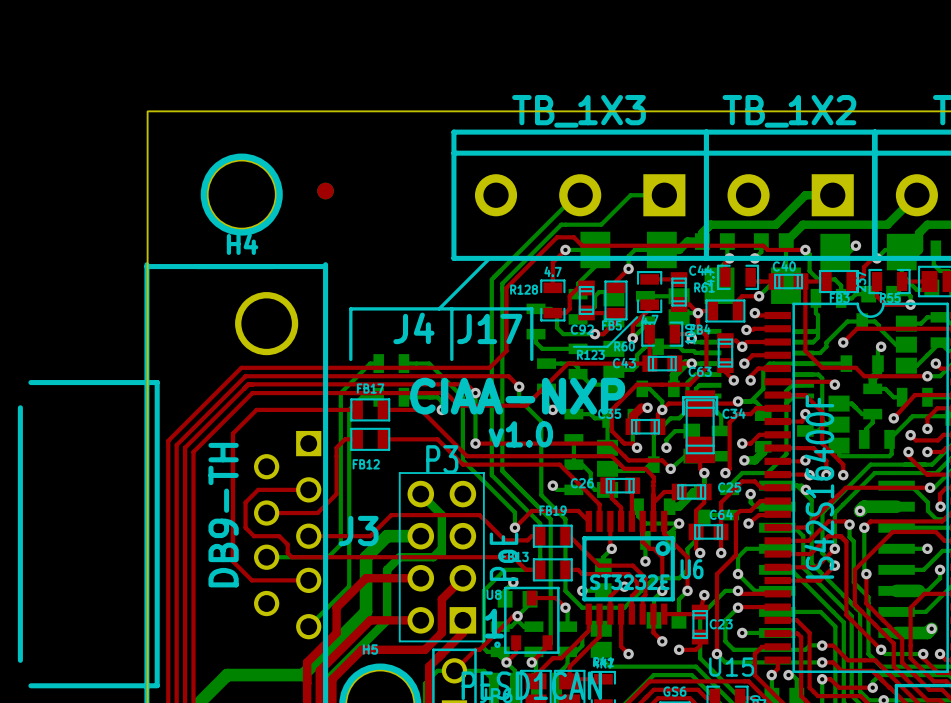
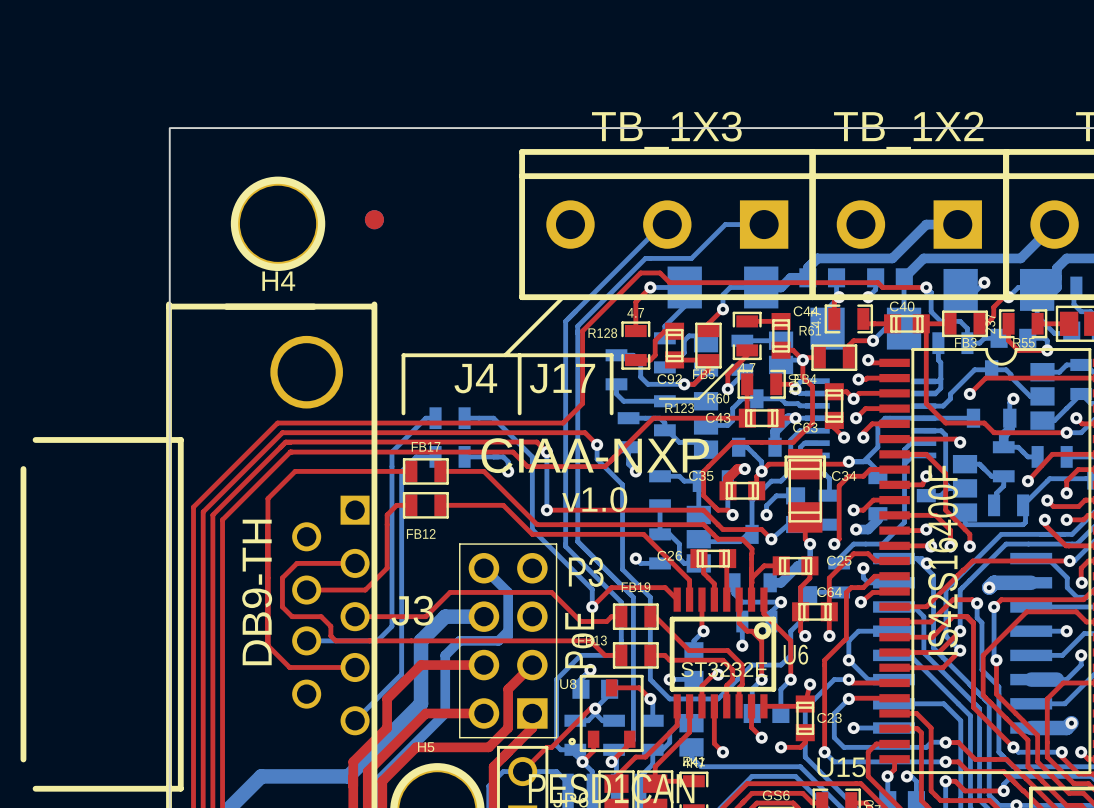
P3 name position: P3 (442, 459) -> P3 (586, 571)
text: 1 (494, 623) -> none

